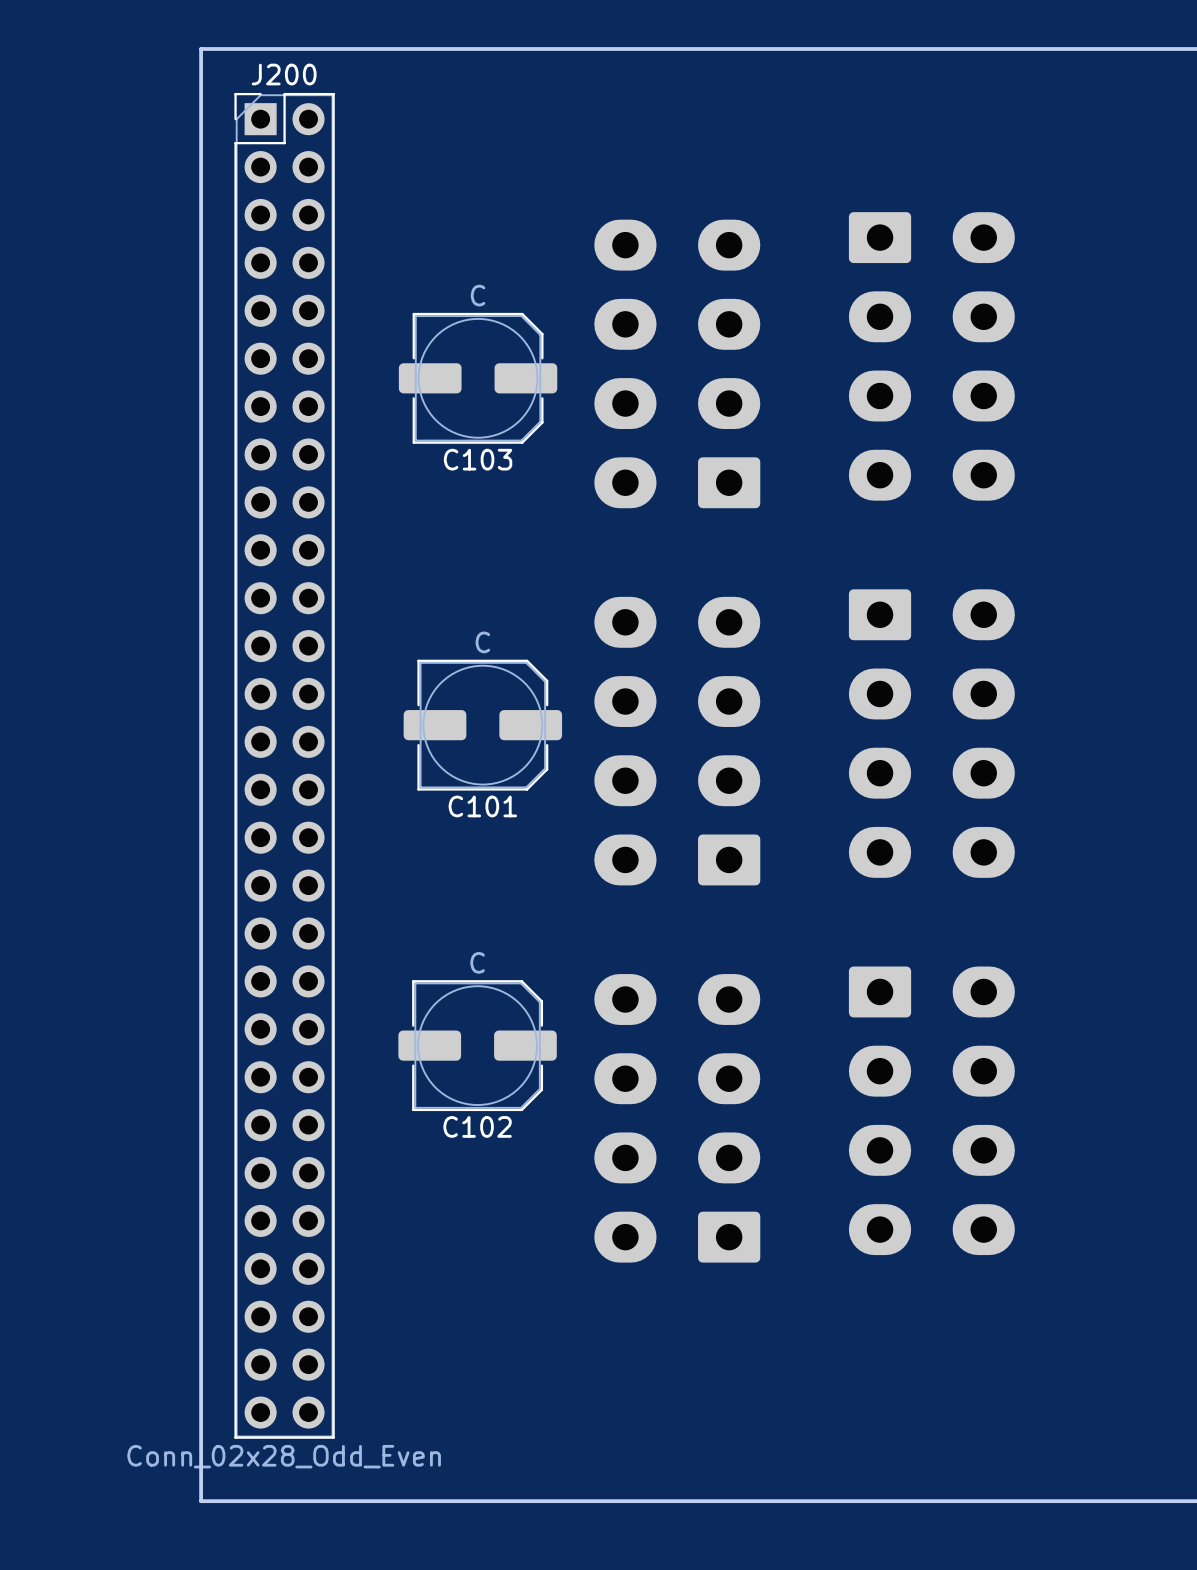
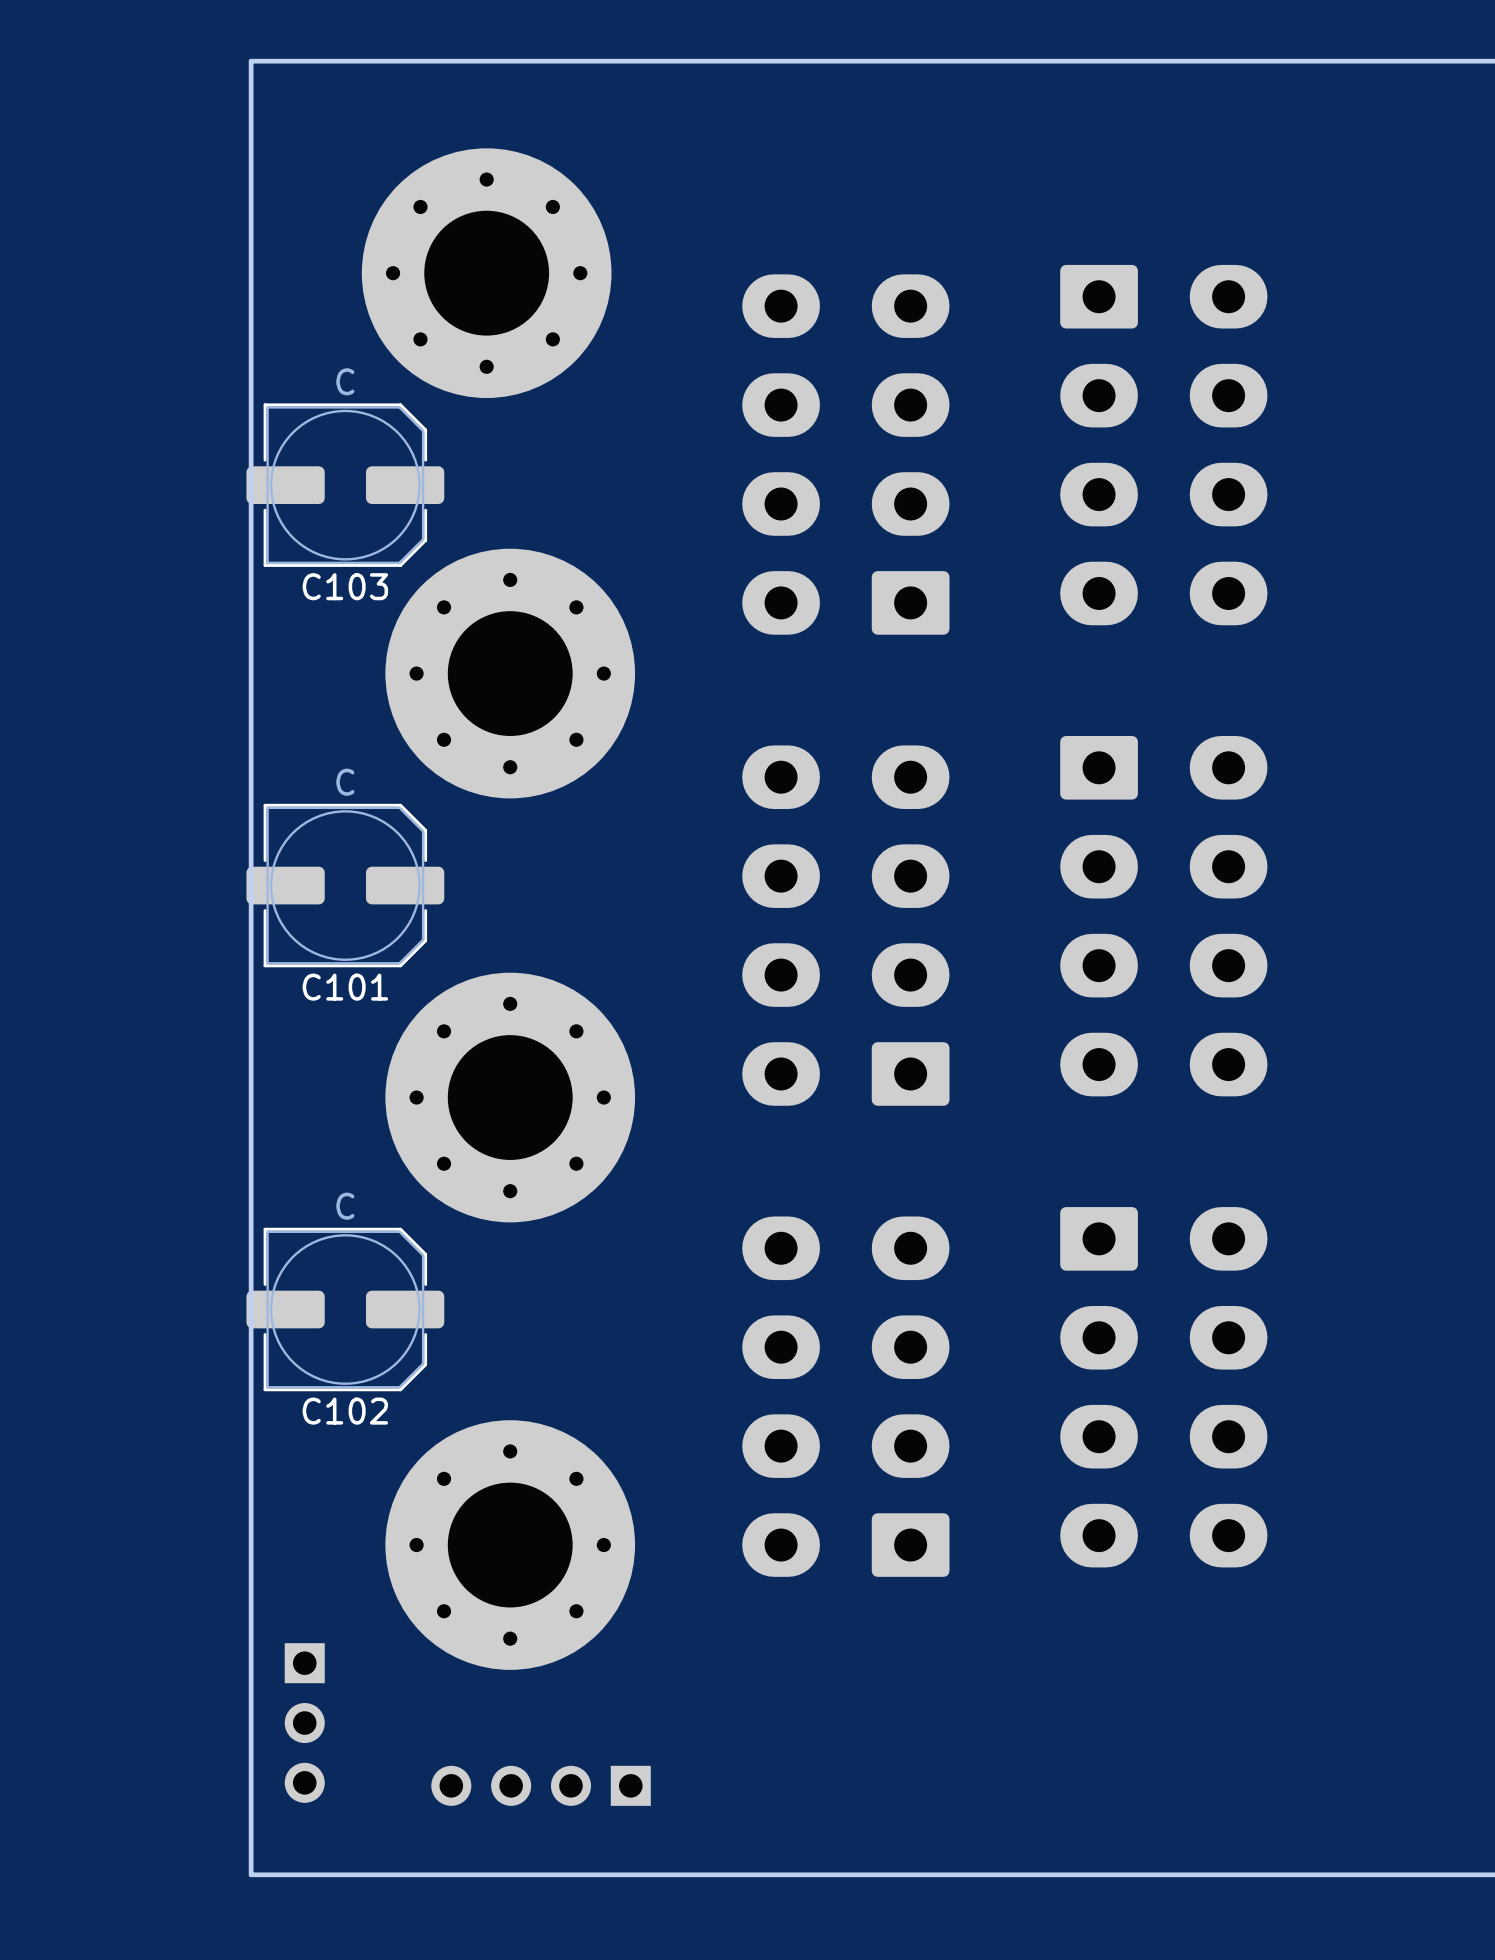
part: none -> (486, 273)
C103 position: (478, 378) -> (345, 485)
part: none -> (510, 673)
C101 position: (482, 725) -> (345, 885)
J200: Conn_02x28_Odd_Even (284, 765) -> none
part: none -> (510, 1097)
C102 position: (477, 1045) -> (345, 1309)
part: none -> (510, 1545)
part: none -> (304, 1723)
part: none -> (541, 1785)

